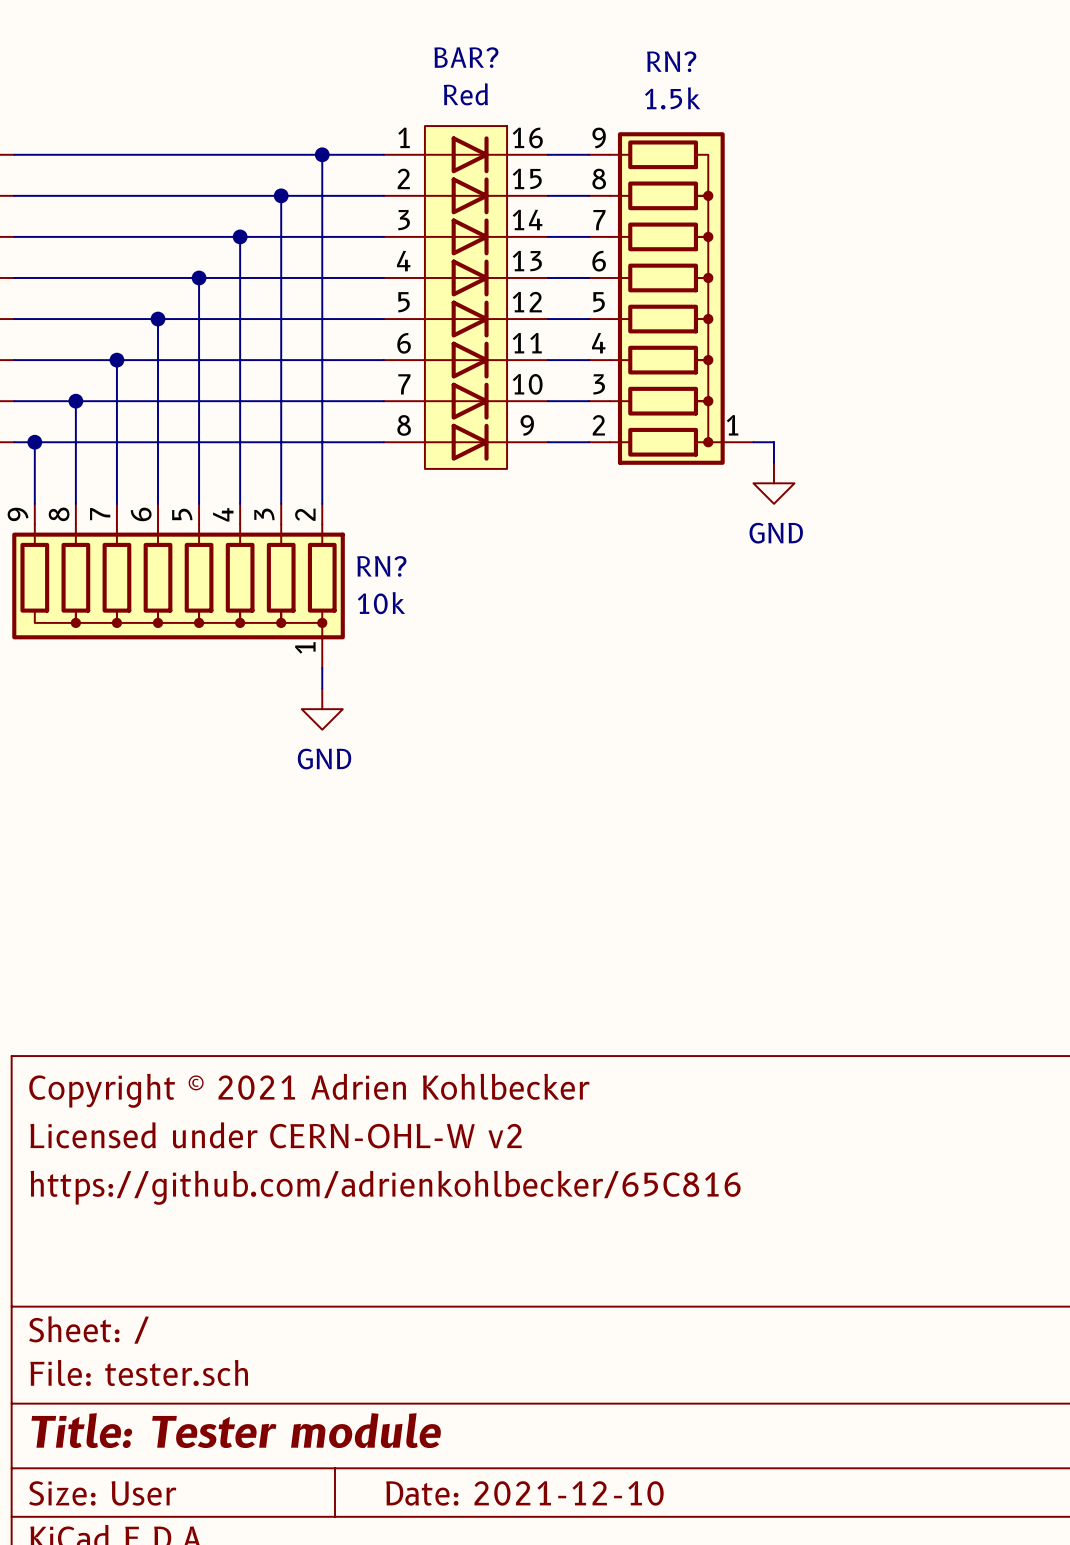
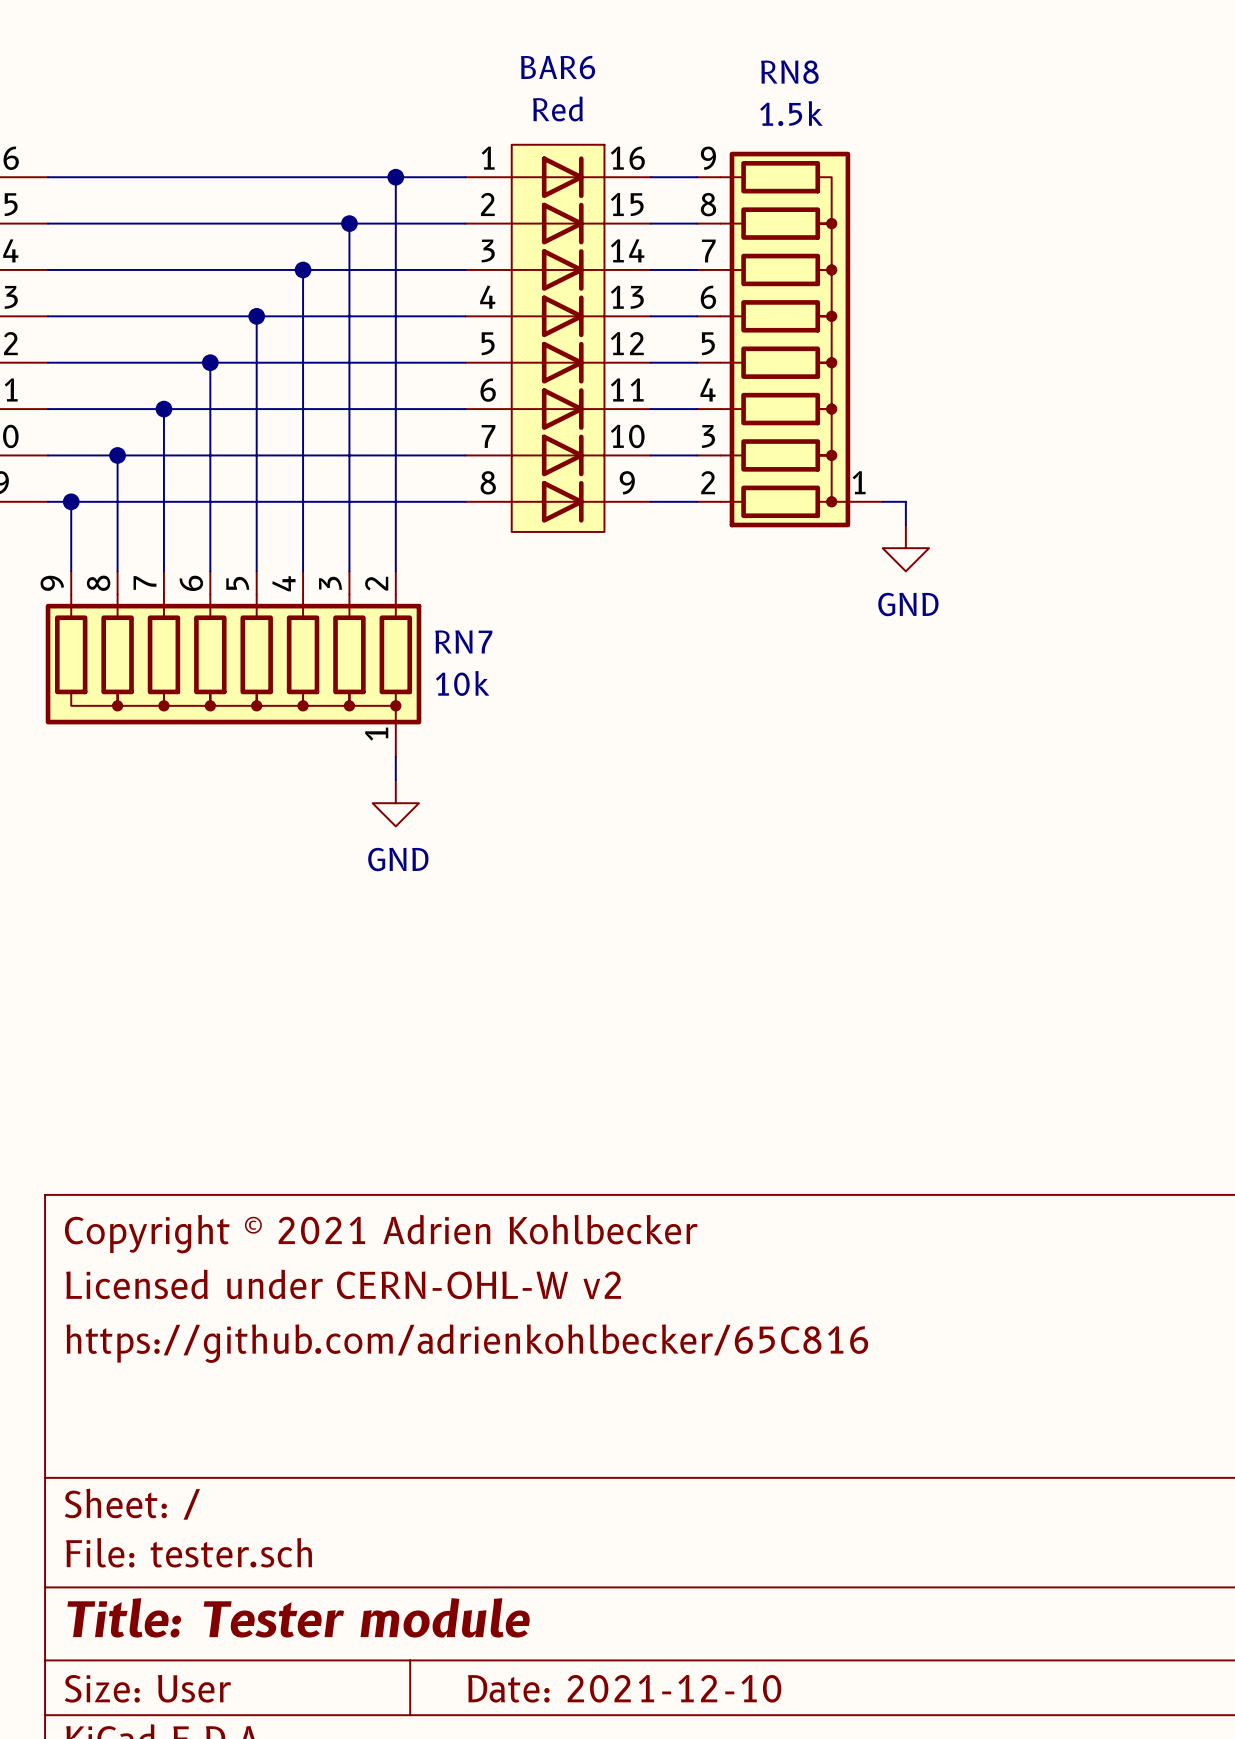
BAR? name: BAR? (466, 57) -> BAR6 (558, 67)
RN? name: RN? (671, 61) -> RN8 (789, 72)
RN? name: RN? (381, 566) -> RN7 (463, 641)

